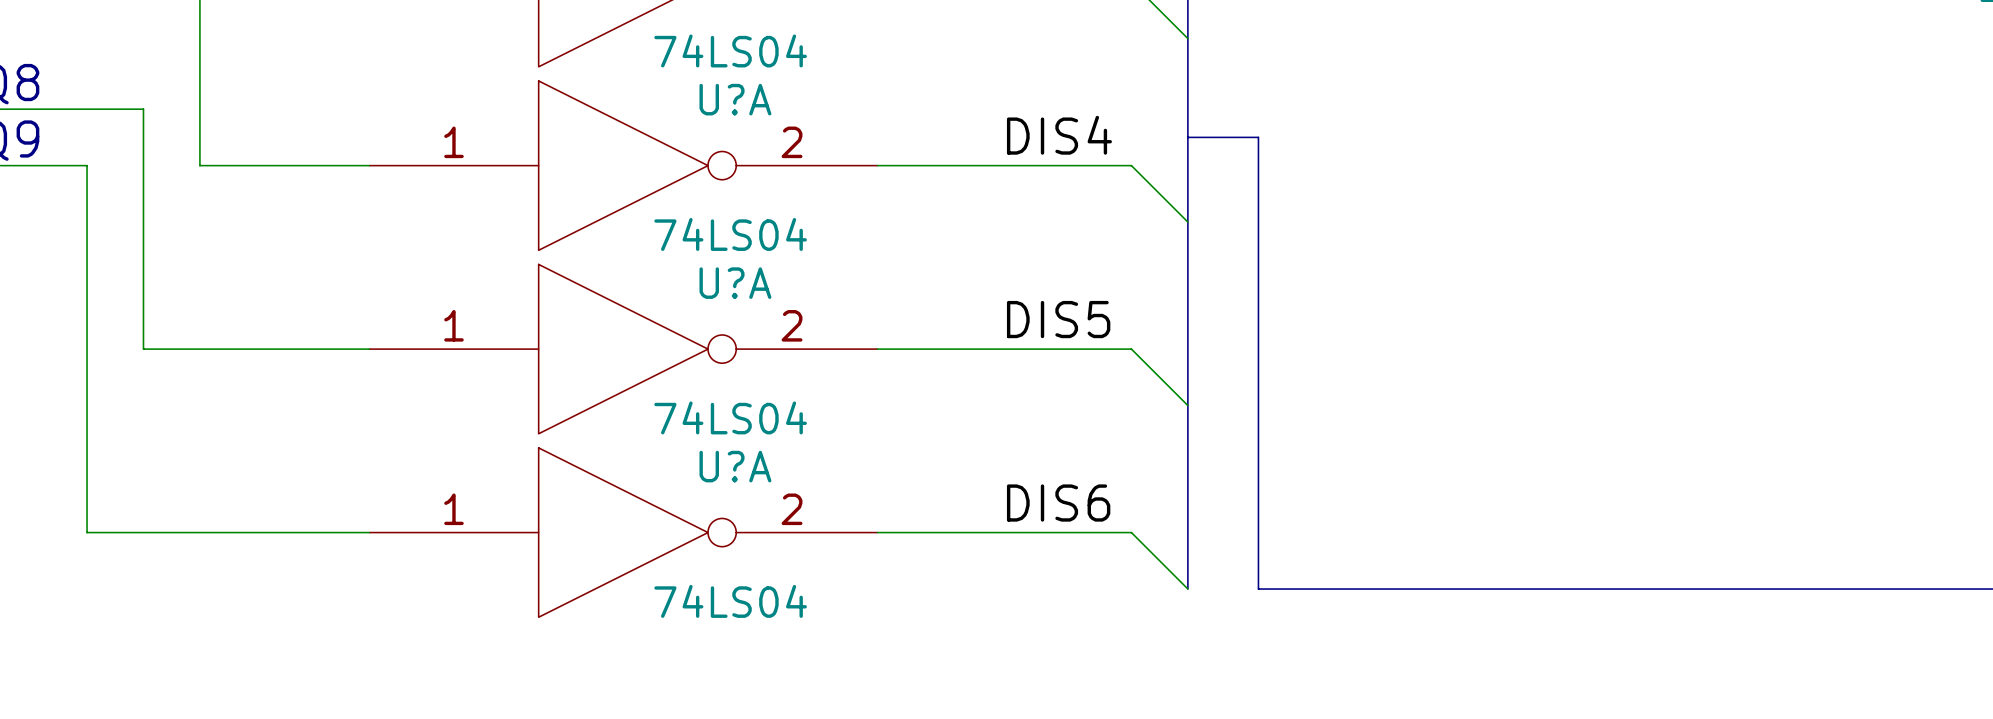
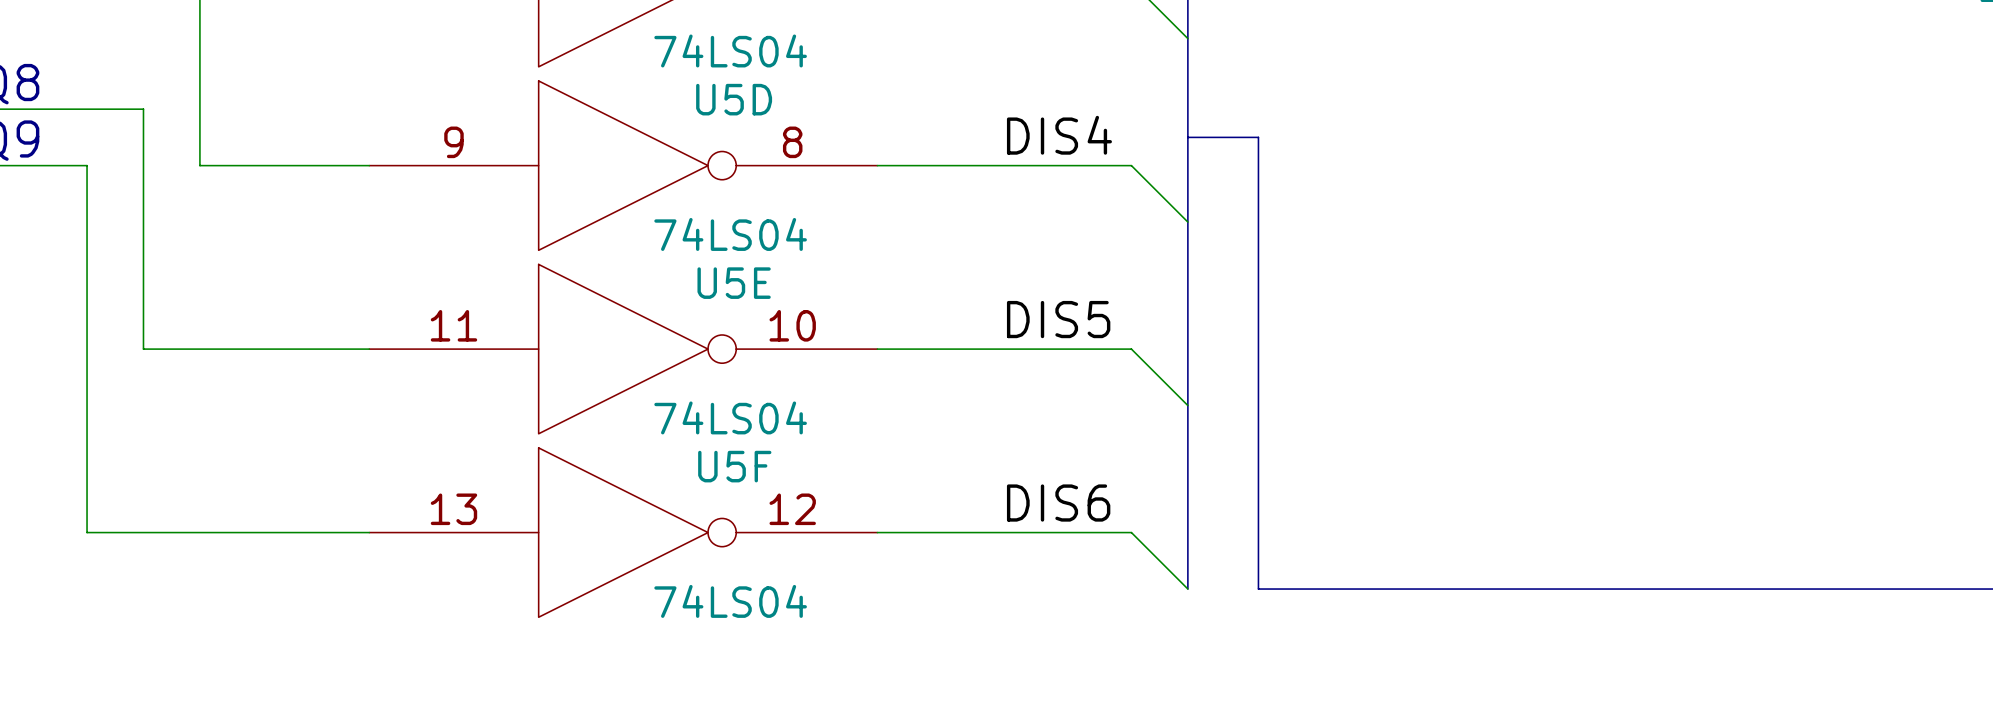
U?A name: U?A (735, 99) -> U5D (734, 99)
U?A pin number: 1 (453, 142) -> 9 (453, 142)
U?A pin number: 2 (792, 142) -> 8 (792, 142)
U?A name: U?A (735, 283) -> U5E (734, 283)
U?A pin number: 1 (453, 325) -> 11 (453, 325)
U?A pin number: 2 (792, 325) -> 10 (792, 325)
U?A name: U?A (735, 466) -> U5F (734, 466)
U?A pin number: 1 (453, 509) -> 13 (453, 509)
U?A pin number: 2 (792, 509) -> 12 (792, 509)

